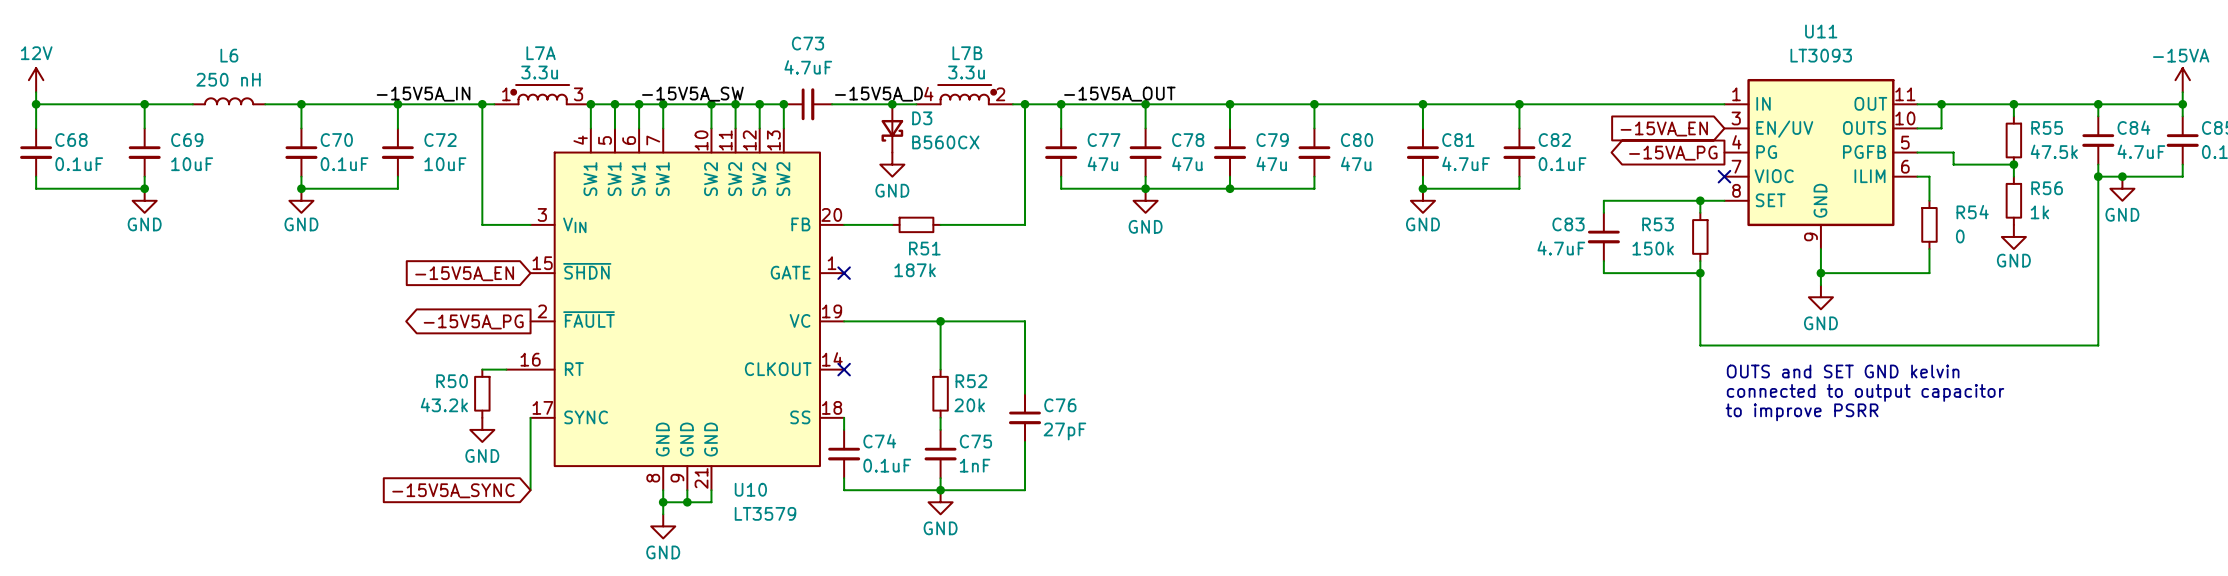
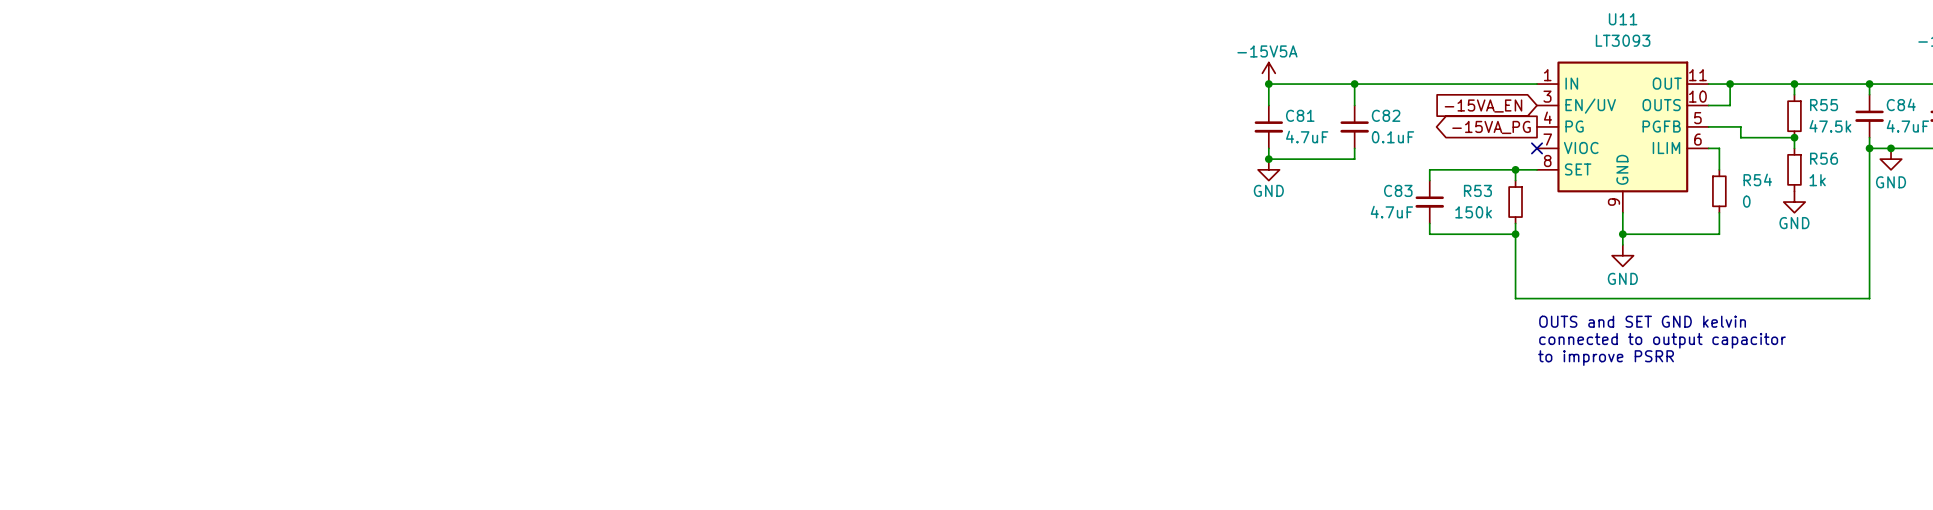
power symbol: 12V (36, 80) -> none
wire: (36, 92) (36, 128) -> none
power symbol: none -> -15V5A (1268, 73)
label: -15V5A_IN (423, 94) -> none
L7A: 3.3u (542, 94) -> none
label: -15V5A_SW (692, 94) -> none
label: -15V5A_D (878, 94) -> none
L7B: 3.3u (964, 94) -> none
label: -15V5A_OUT (1119, 94) -> none
L6: 250 nH (229, 101) -> none
wire: (36, 104) (192, 104) -> none
junction: (36, 104) -> none
wire: (144, 104) (144, 128) -> none
junction: (144, 104) -> none
wire: (265, 104) (494, 104) -> none
wire: (301, 104) (301, 128) -> none
junction: (301, 104) -> none
wire: (397, 104) (397, 128) -> none
junction: (397, 104) -> none
wire: (482, 104) (482, 224) (530, 224) -> none
junction: (482, 104) -> none
junction: (590, 104) -> none
wire: (614, 104) (614, 128) -> none
junction: (614, 104) -> none
wire: (639, 104) (639, 128) -> none
junction: (639, 104) -> none
wire: (663, 104) (663, 128) -> none
junction: (663, 104) -> none
wire: (711, 104) (711, 128) -> none
junction: (711, 104) -> none
wire: (735, 104) (735, 128) -> none
junction: (735, 104) -> none
wire: (759, 104) (759, 128) -> none
junction: (759, 104) -> none
junction: (783, 104) -> none
C73: 4.7uF (807, 104) -> none
wire: (832, 104) (916, 104) -> none
junction: (892, 104) -> none
wire: (1012, 104) (1422, 104) -> none
wire: (1025, 104) (1025, 224) (940, 224) -> none
junction: (1025, 104) -> none
wire: (1061, 104) (1061, 128) -> none
junction: (1061, 104) -> none
wire: (1145, 104) (1145, 128) -> none
junction: (1145, 104) -> none
wire: (1230, 104) (1230, 128) -> none
junction: (1230, 104) -> none
wire: (1314, 104) (1314, 128) -> none
junction: (1314, 104) -> none
wire: (590, 128) (590, 104) (783, 104) (783, 128) -> none
D3: B560CX (892, 128) -> none
C68: 0.1uF (36, 152) -> none
C69: 10uF (144, 152) -> none
C70: 0.1uF (301, 152) -> none
C72: 10uF (397, 152) -> none
C77: 47u (1061, 152) -> none
C78: 47u (1145, 152) -> none
C79: 47u (1230, 152) -> none
C80: 47u (1314, 152) -> none
power symbol: GND (892, 164) -> none
wire: (36, 176) (36, 188) (144, 188) (144, 176) -> none
wire: (301, 176) (301, 188) (397, 188) (397, 176) -> none
wire: (1061, 176) (1061, 188) (1314, 188) (1314, 176) -> none
wire: (1145, 176) (1145, 188) -> none
wire: (1230, 176) (1230, 188) -> none
junction: (144, 188) -> none
junction: (301, 188) -> none
junction: (1145, 188) -> none
junction: (1230, 188) -> none
power symbol: GND (144, 200) -> none
power symbol: GND (301, 200) -> none
power symbol: GND (1145, 200) -> none
wire: (844, 224) (892, 224) -> none
R51: 187k (916, 224) -> none
global label: -15V5A_EN (464, 273) -> none
no-connect mark: (844, 273) -> none
U10: LT3579 (675, 309) -> none
global label: -15V5A_PG (473, 321) -> none
wire: (844, 321) (1025, 321) (1025, 393) -> none
wire: (940, 321) (940, 369) -> none
junction: (940, 321) -> none
wire: (482, 369) (506, 369) -> none
no-connect mark: (844, 369) -> none
R50: 43.2k (482, 393) -> none
R52: 20k (940, 393) -> none
wire: (530, 417) (530, 490) -> none
wire: (844, 417) (844, 429) -> none
wire: (940, 417) (940, 429) -> none
C76: 27pF (1025, 417) -> none
power symbol: GND (482, 429) -> none
wire: (1025, 441) (1025, 490) (844, 490) (844, 478) -> none
C74: 0.1uF (844, 454) -> none
C75: 1nF (940, 454) -> none
wire: (940, 478) (940, 490) -> none
global label: -15V5A_SYNC (453, 490) -> none
wire: (663, 490) (663, 514) -> none
wire: (687, 490) (687, 502) -> none
wire: (711, 490) (711, 502) (663, 502) -> none
junction: (940, 490) -> none
junction: (663, 502) -> none
junction: (687, 502) -> none
power symbol: GND (940, 502) -> none
power symbol: GND (663, 526) -> none

